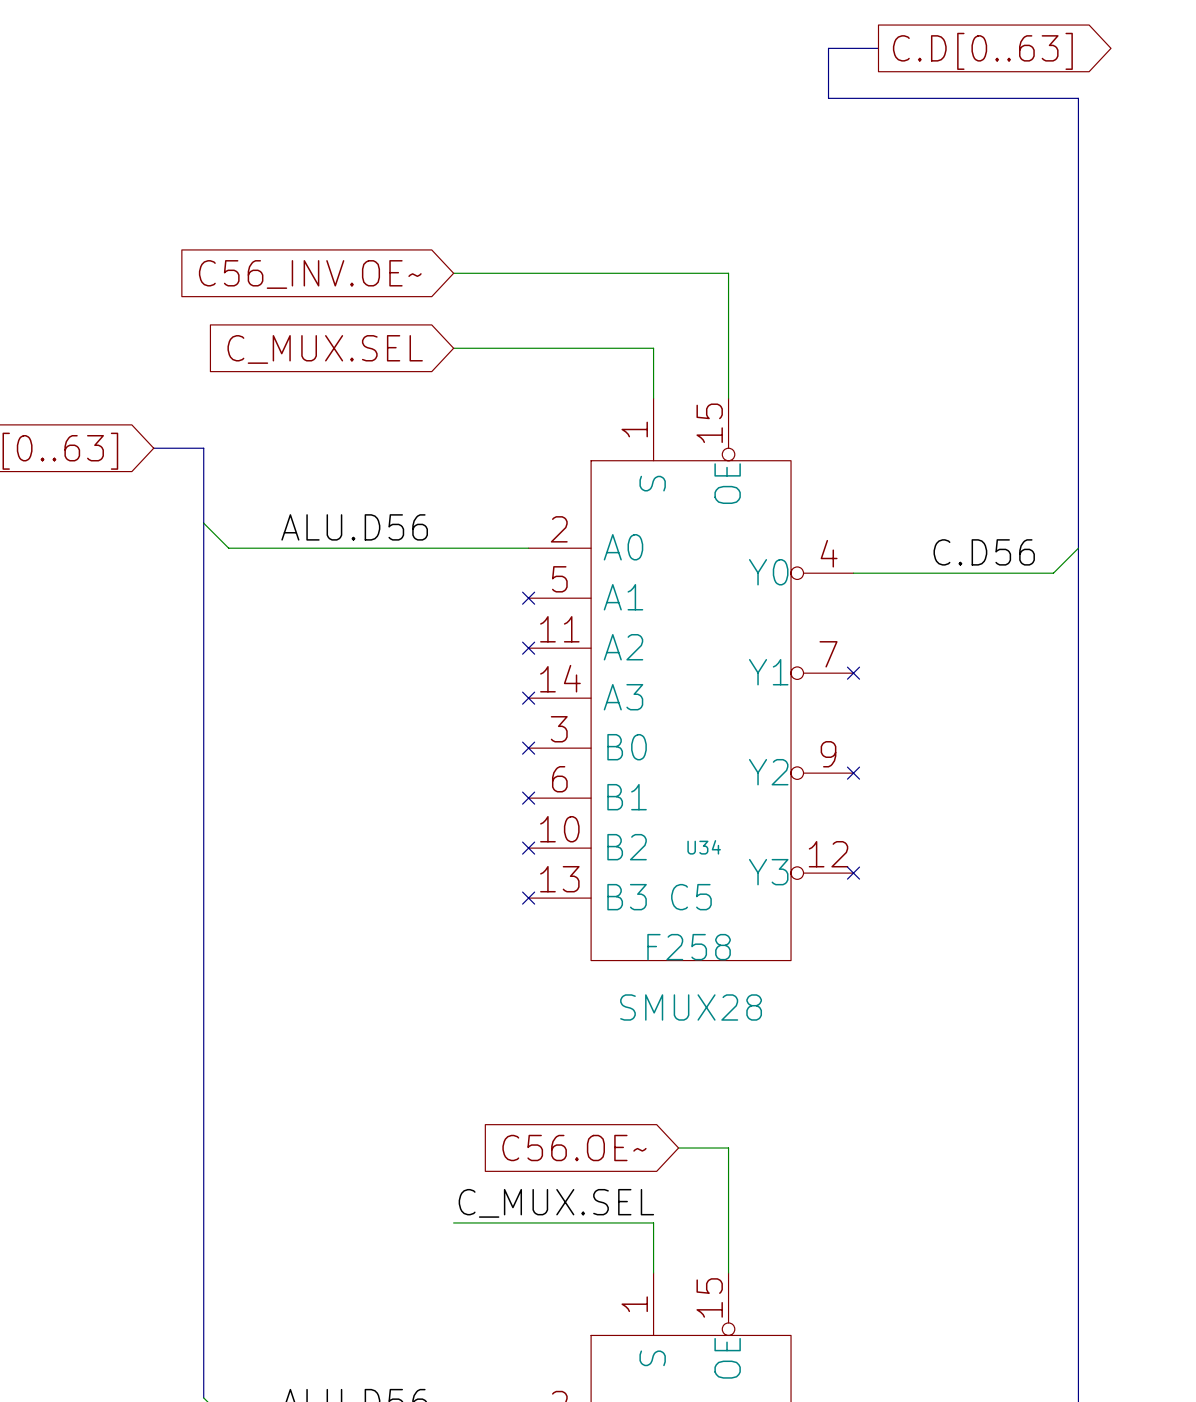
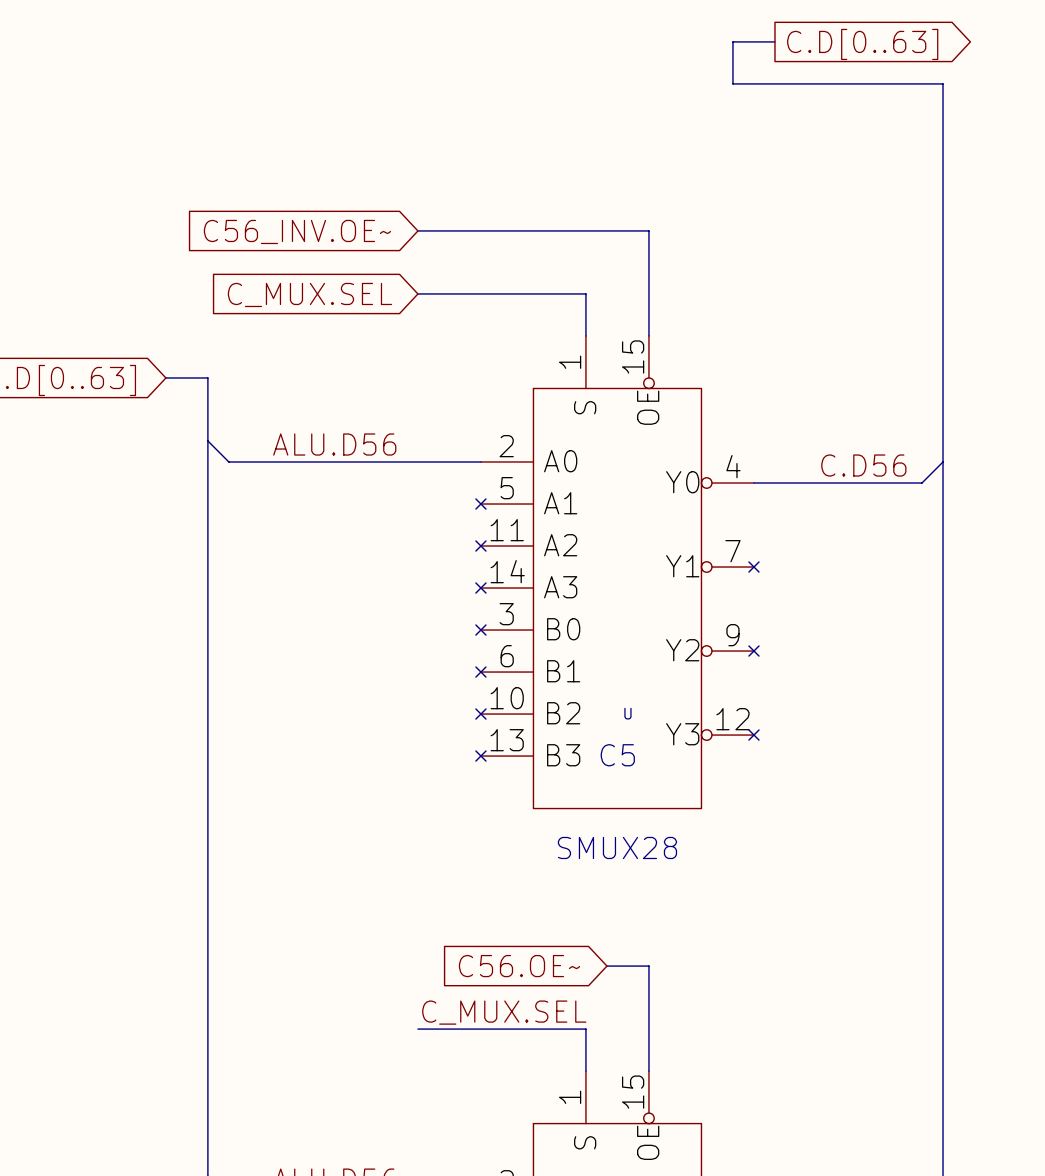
U34 name: U34 (704, 847) -> U (627, 713)
U34 value: F258 (689, 947) -> none

